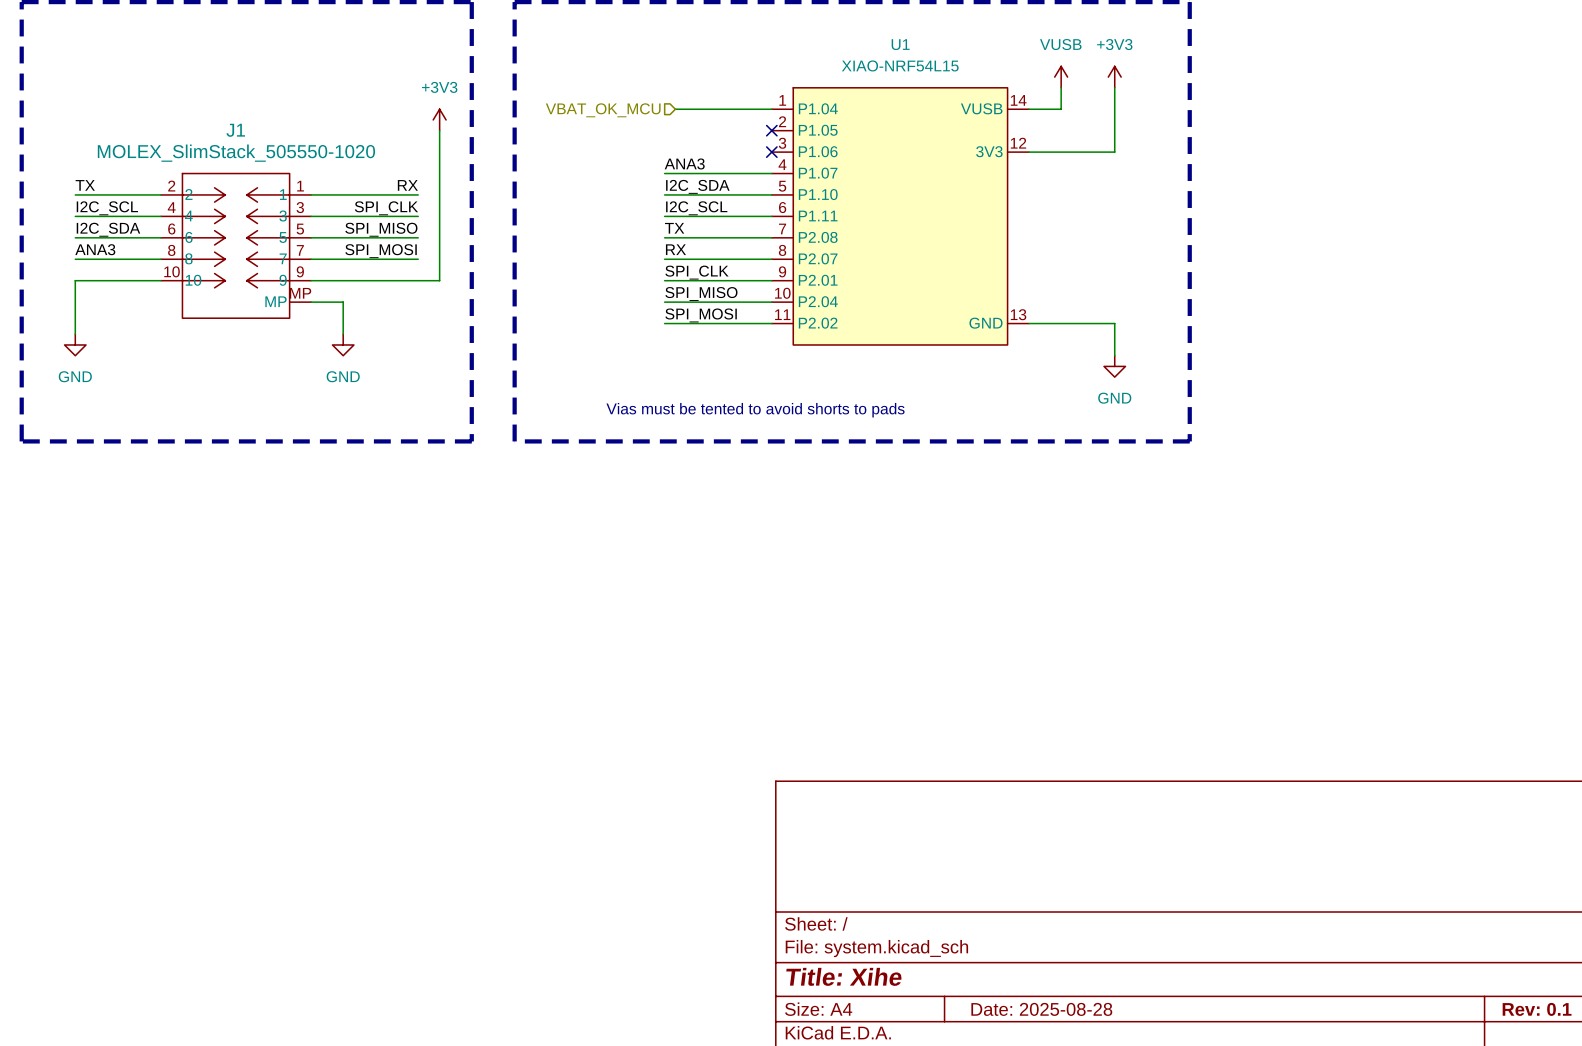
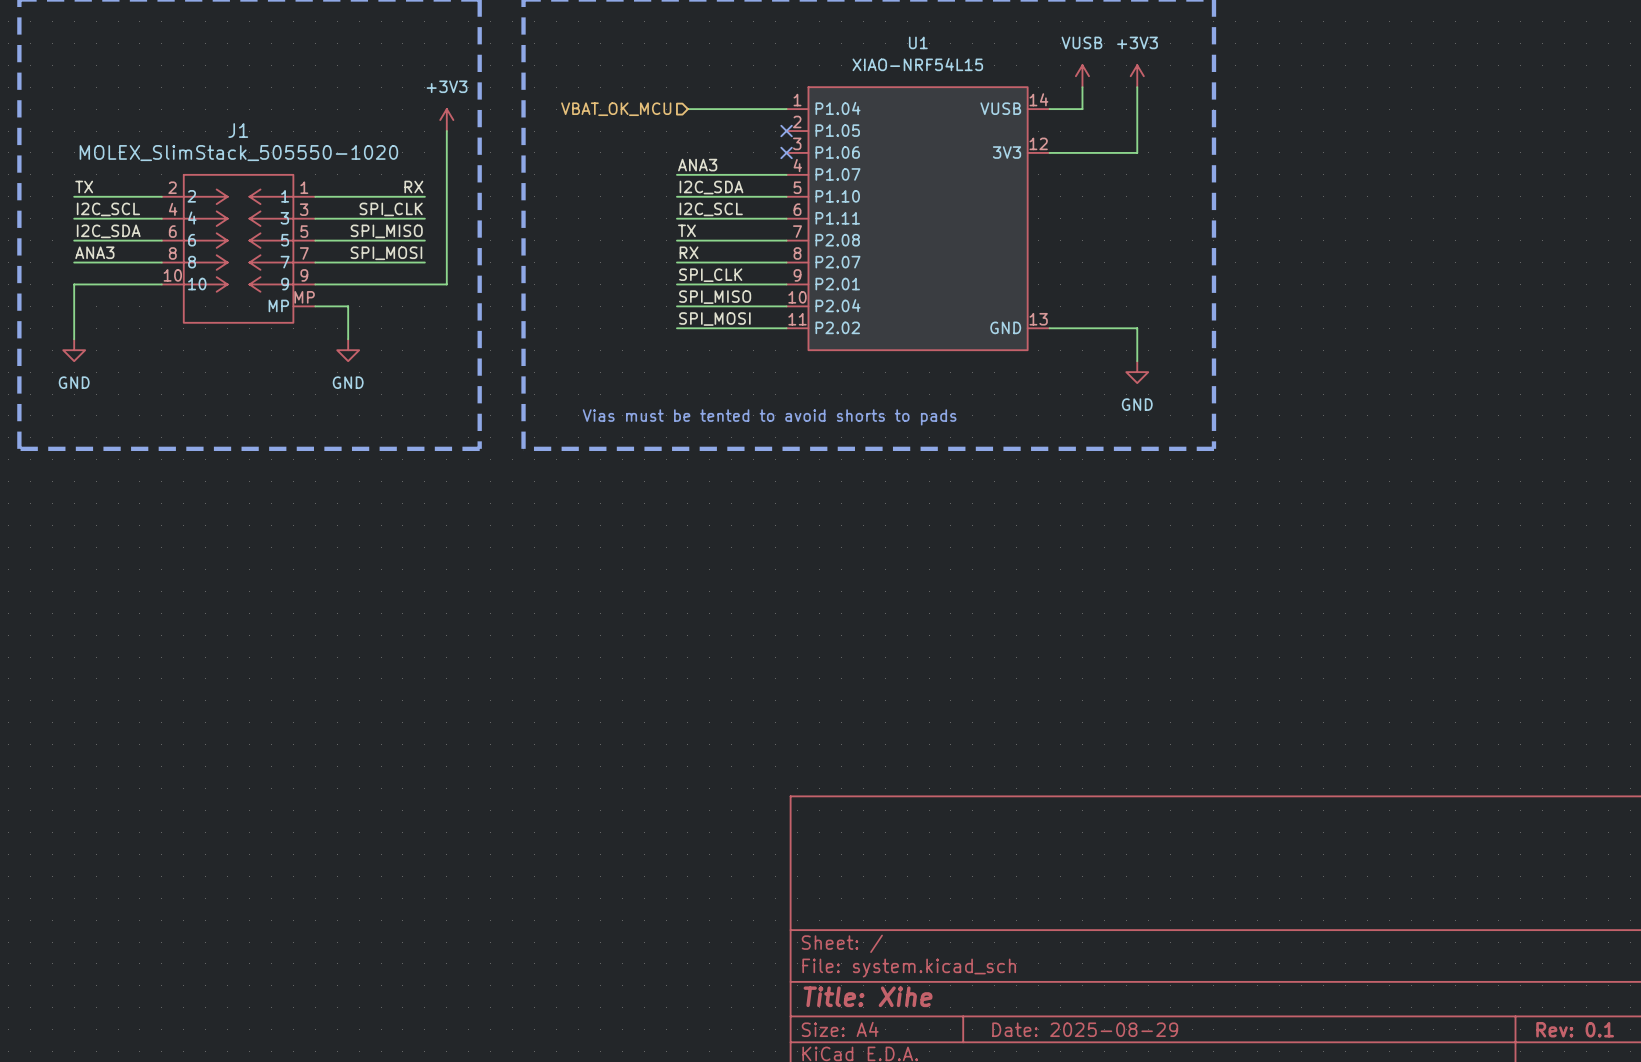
title block: Date: 2025-08-28 (1041, 1009) -> Date: 2025-08-29 (1085, 1029)

